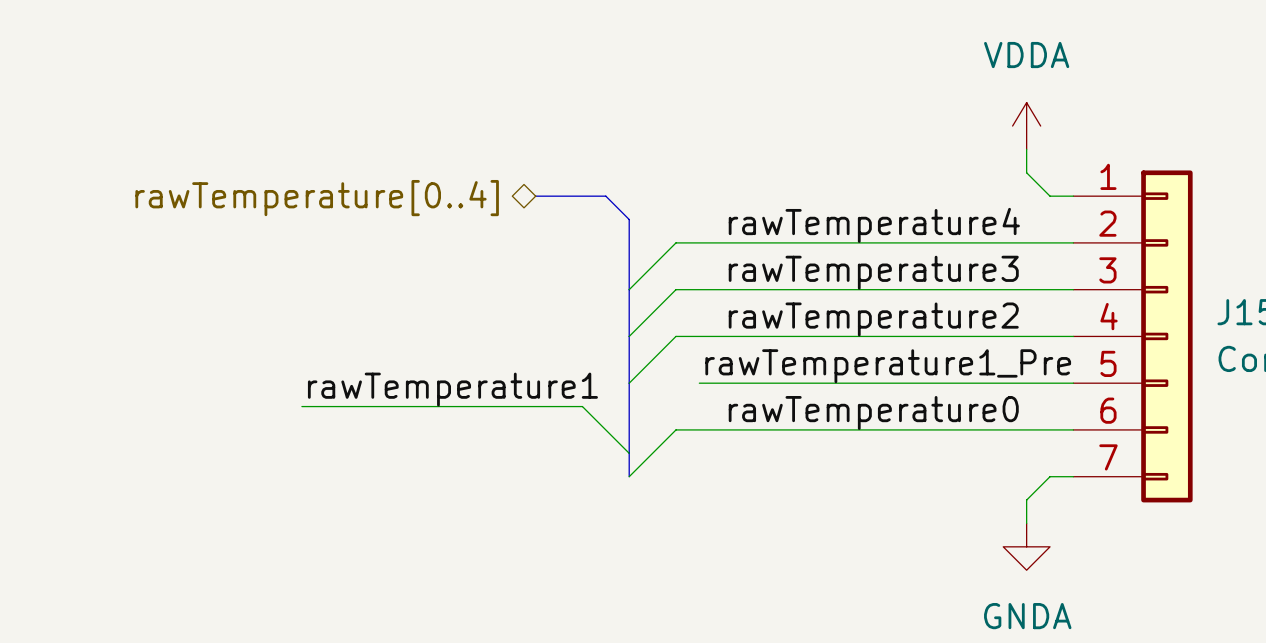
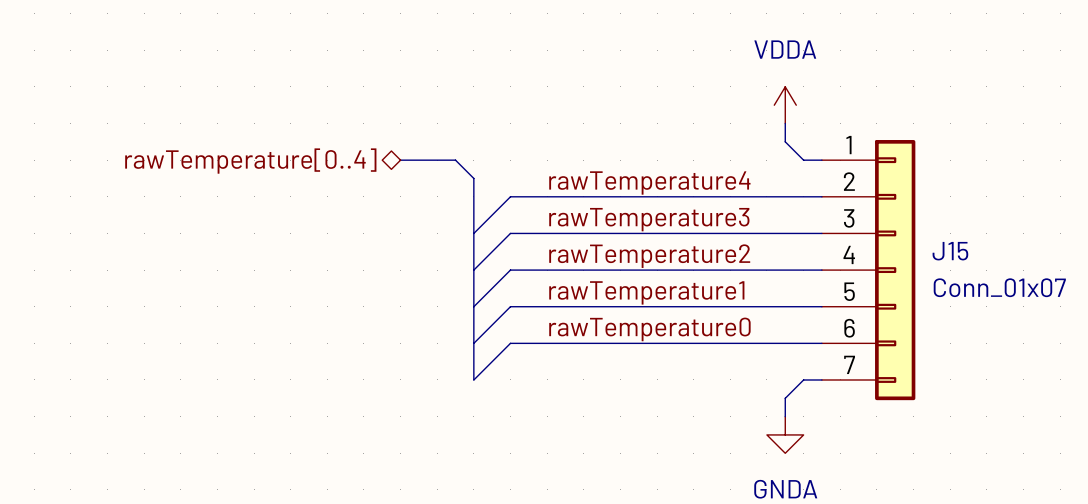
label: rawTemperature1_Pre (888, 366) -> none
wire: none -> (528, 306) (510, 306) (473, 343)
label position: rawTemperature1 (452, 389) -> rawTemperature1 (646, 292)
wire: (301, 406) (582, 406) (629, 453) -> none

